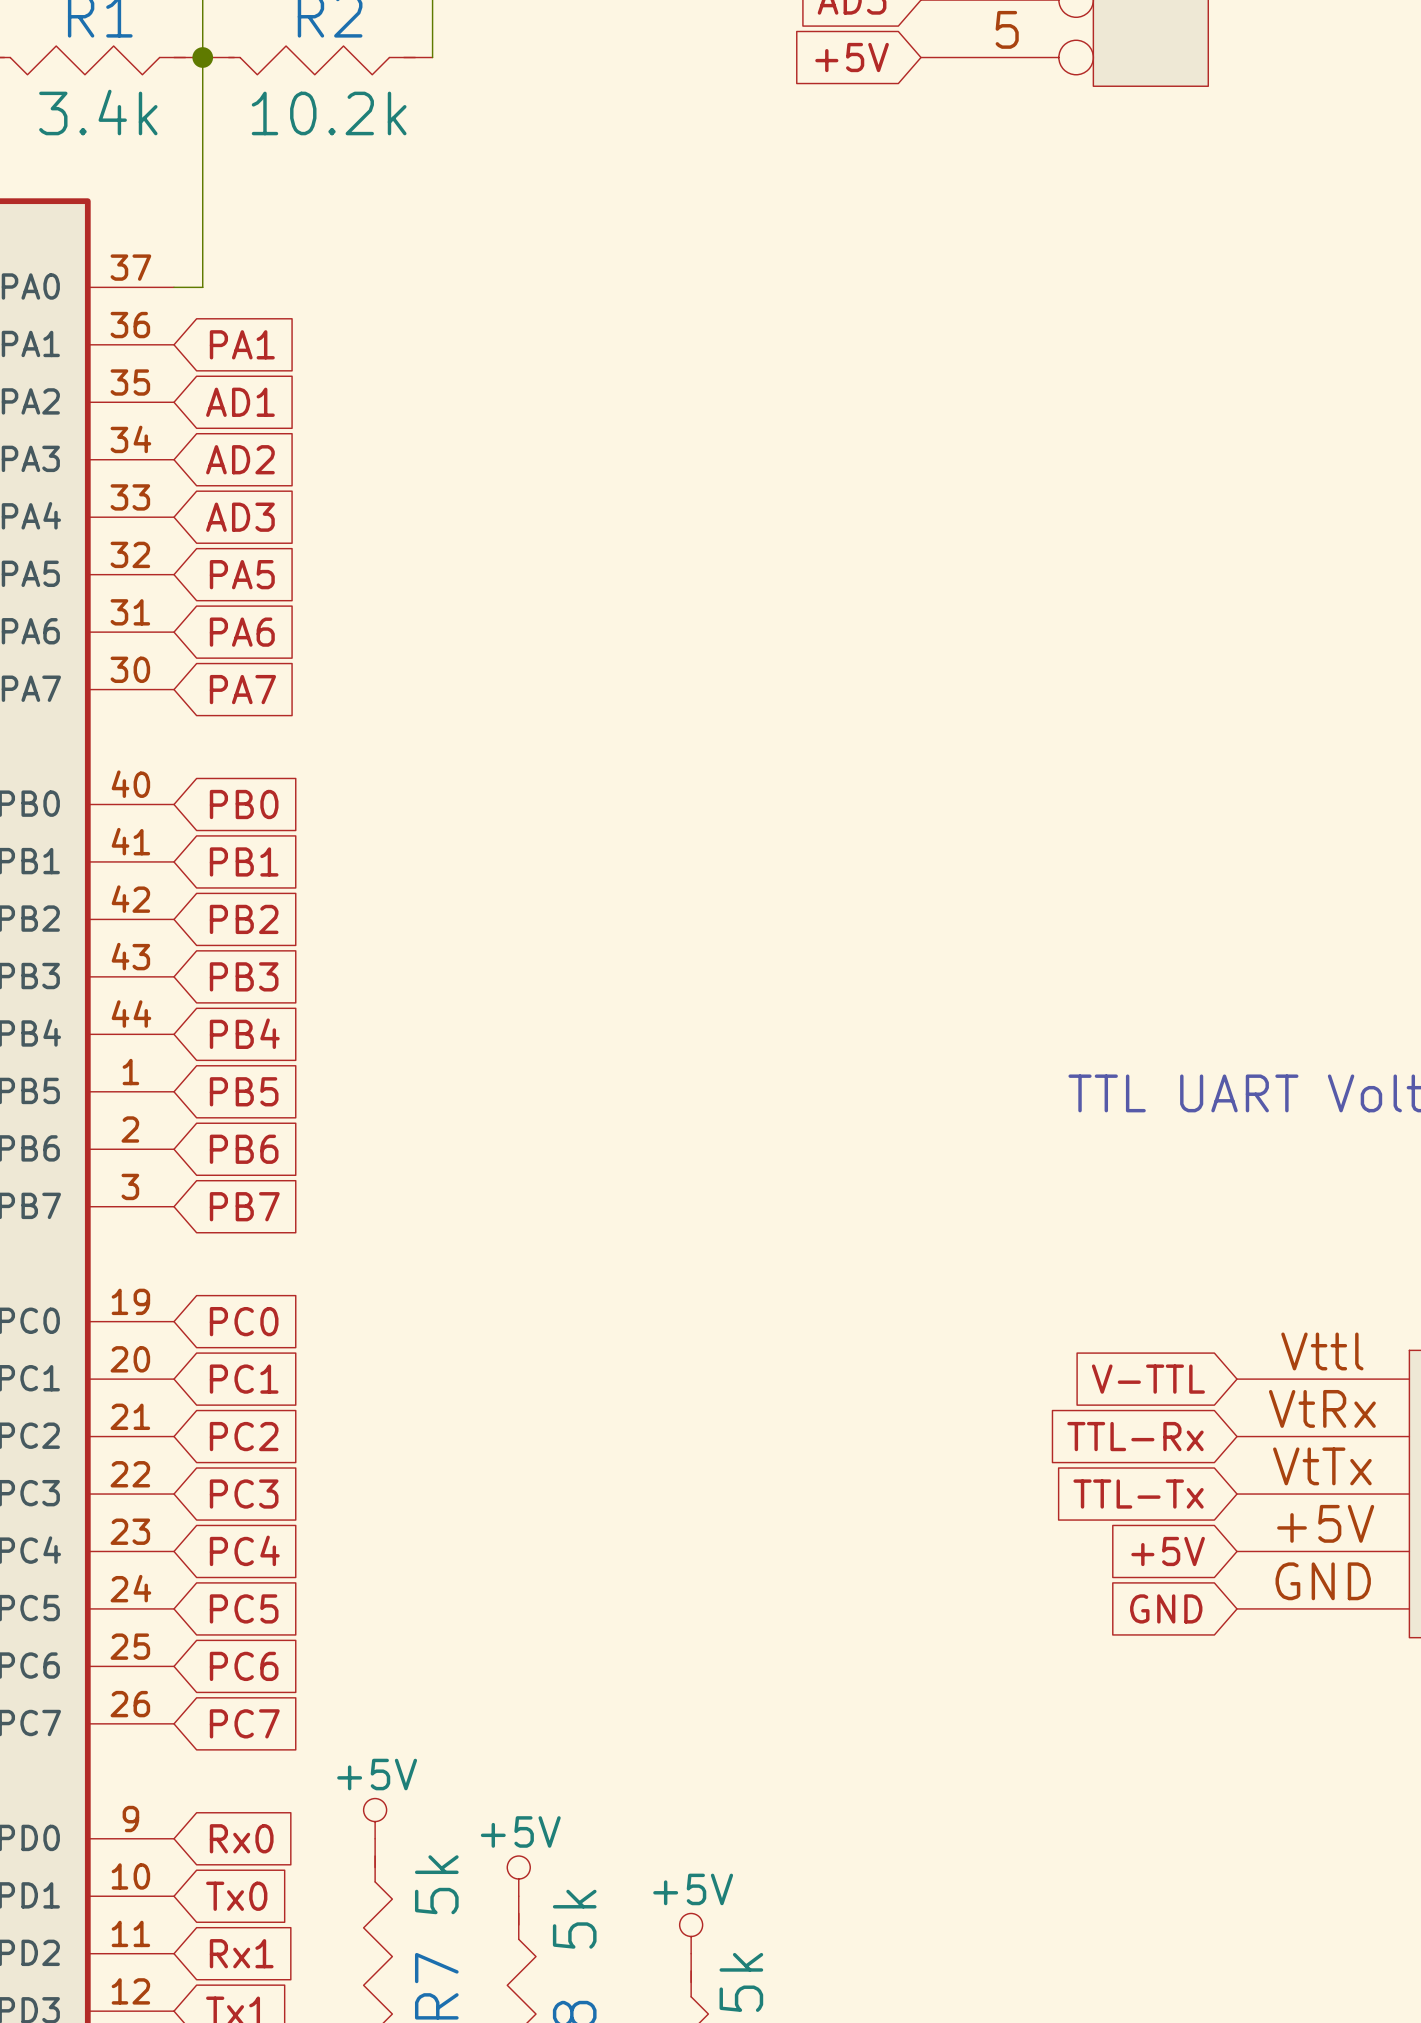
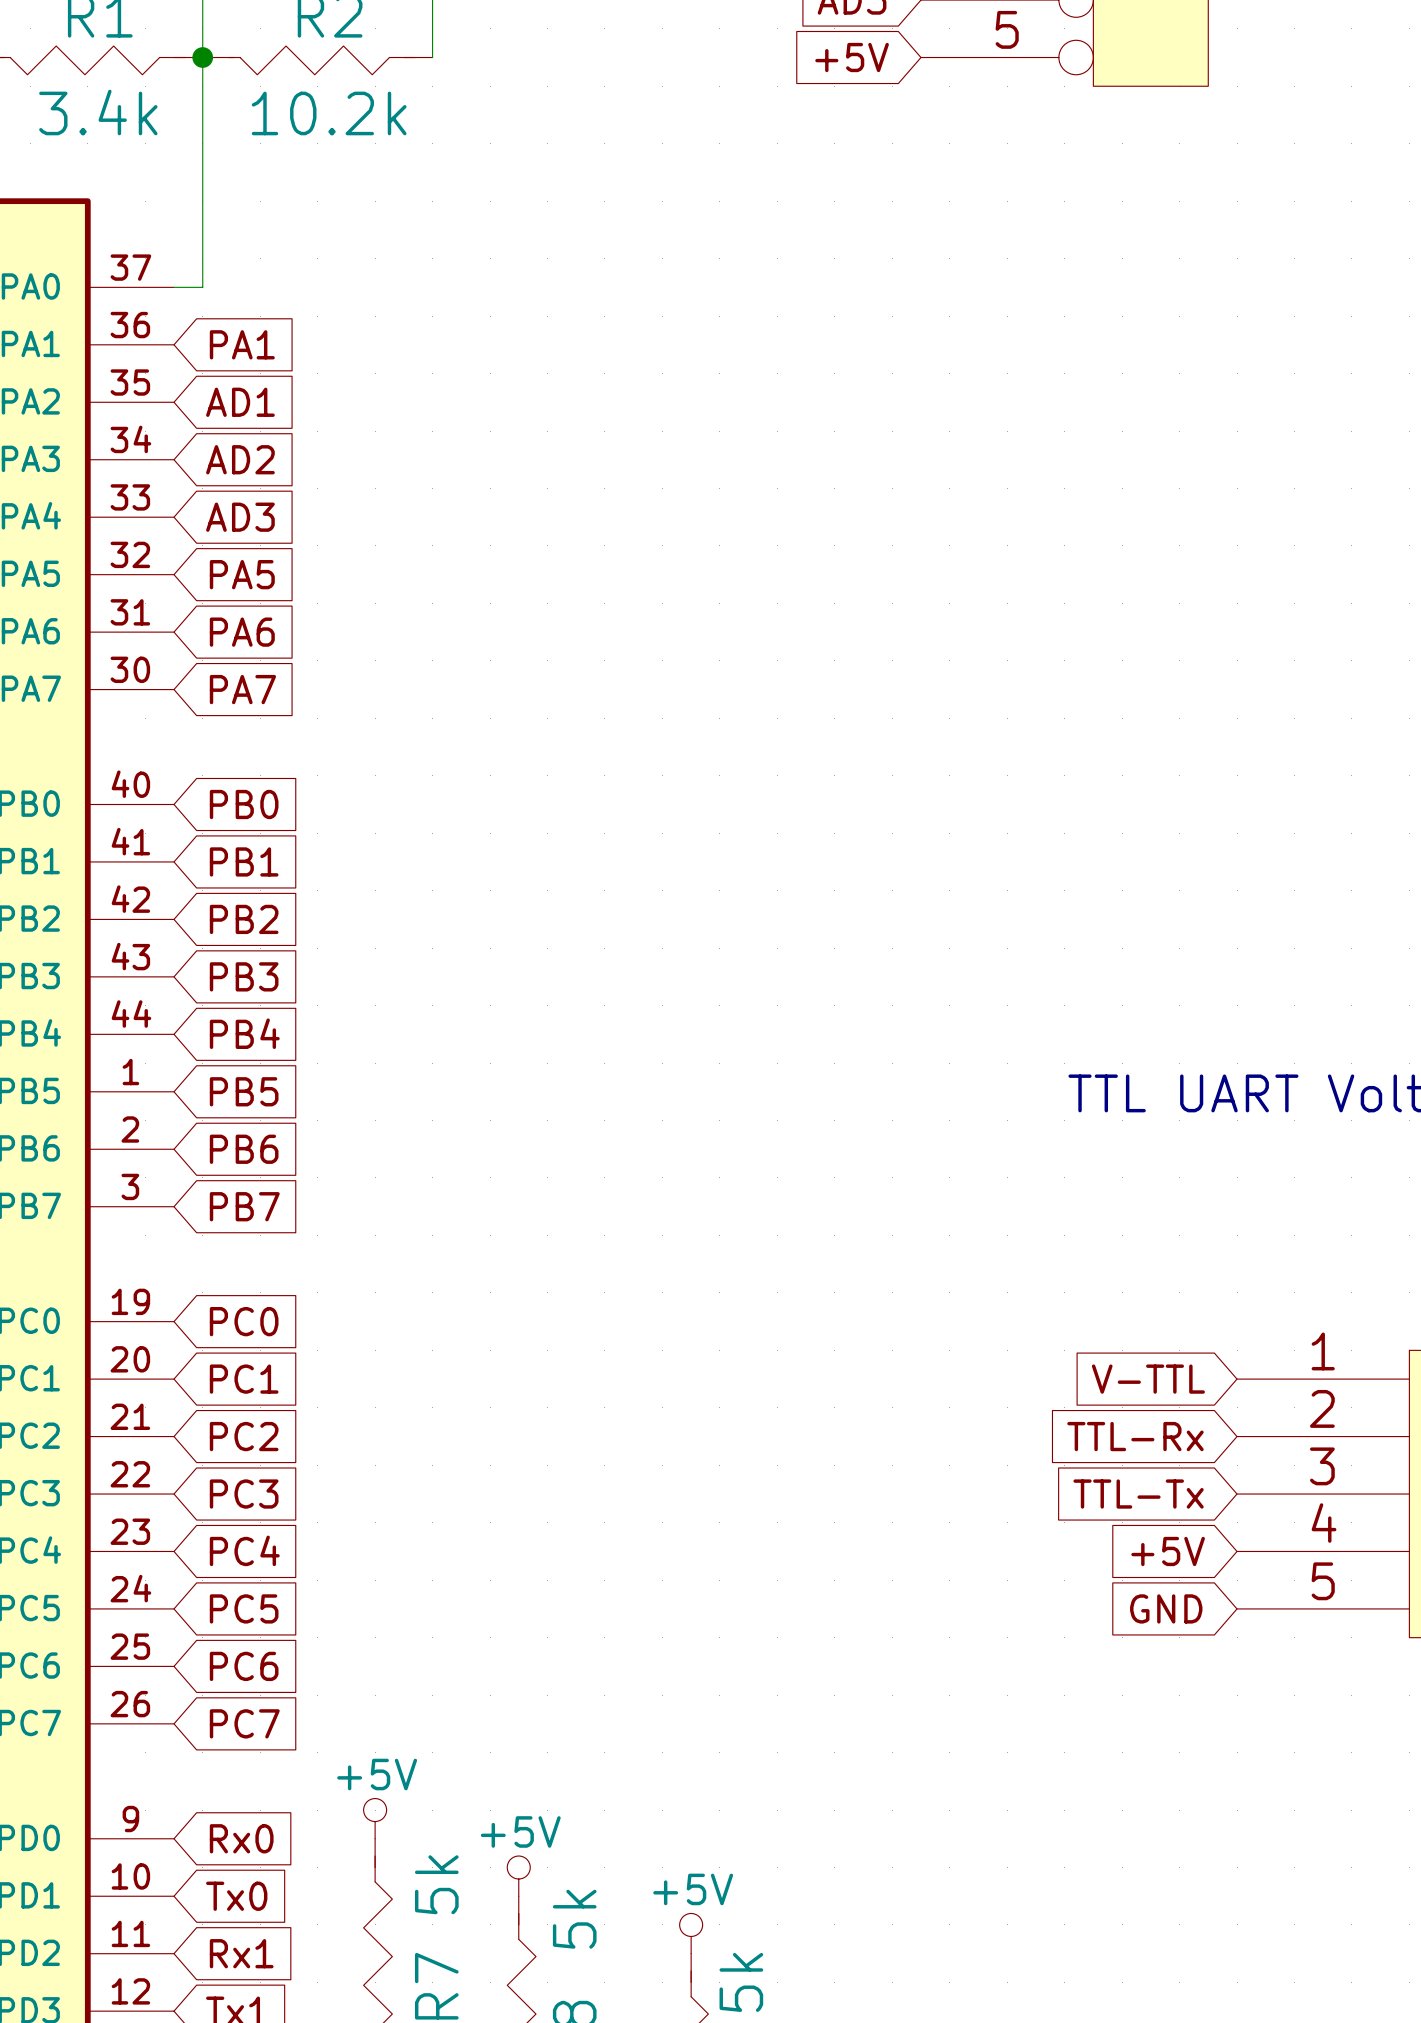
part pin number: Vttl (1322, 1351) -> 1 (1323, 1351)
part pin number: VtRx (1322, 1408) -> 2 (1322, 1408)
part pin number: VtTx (1322, 1466) -> 3 (1322, 1466)
part pin number: +5V (1325, 1523) -> 4 (1324, 1523)
part pin number: GND (1323, 1581) -> 5 (1323, 1581)

